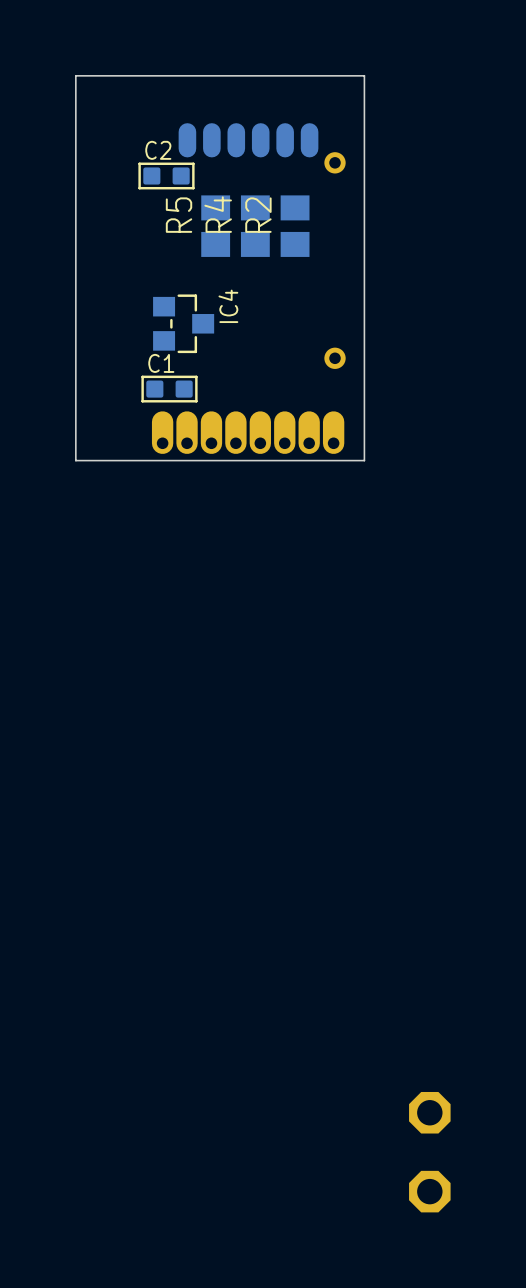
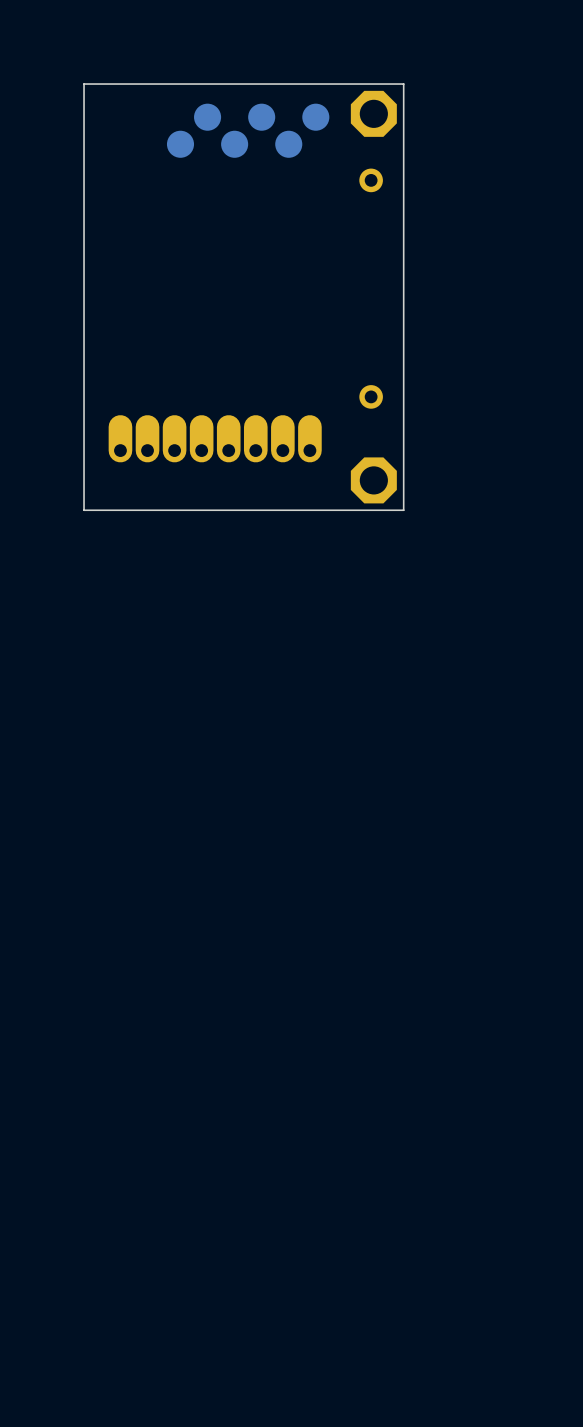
part: none -> (373, 113)
part: none -> (248, 130)
part: (248, 140) -> none
C2: (166, 175) -> none
R5: (215, 226) -> none
R4: (255, 226) -> none
R2: (295, 226) -> none
IC4: (183, 323) -> none
C1: (169, 389) -> none
part position: (248, 432) -> (215, 438)
part: none -> (373, 480)
part: (429, 1112) -> none
part: (429, 1191) -> none

